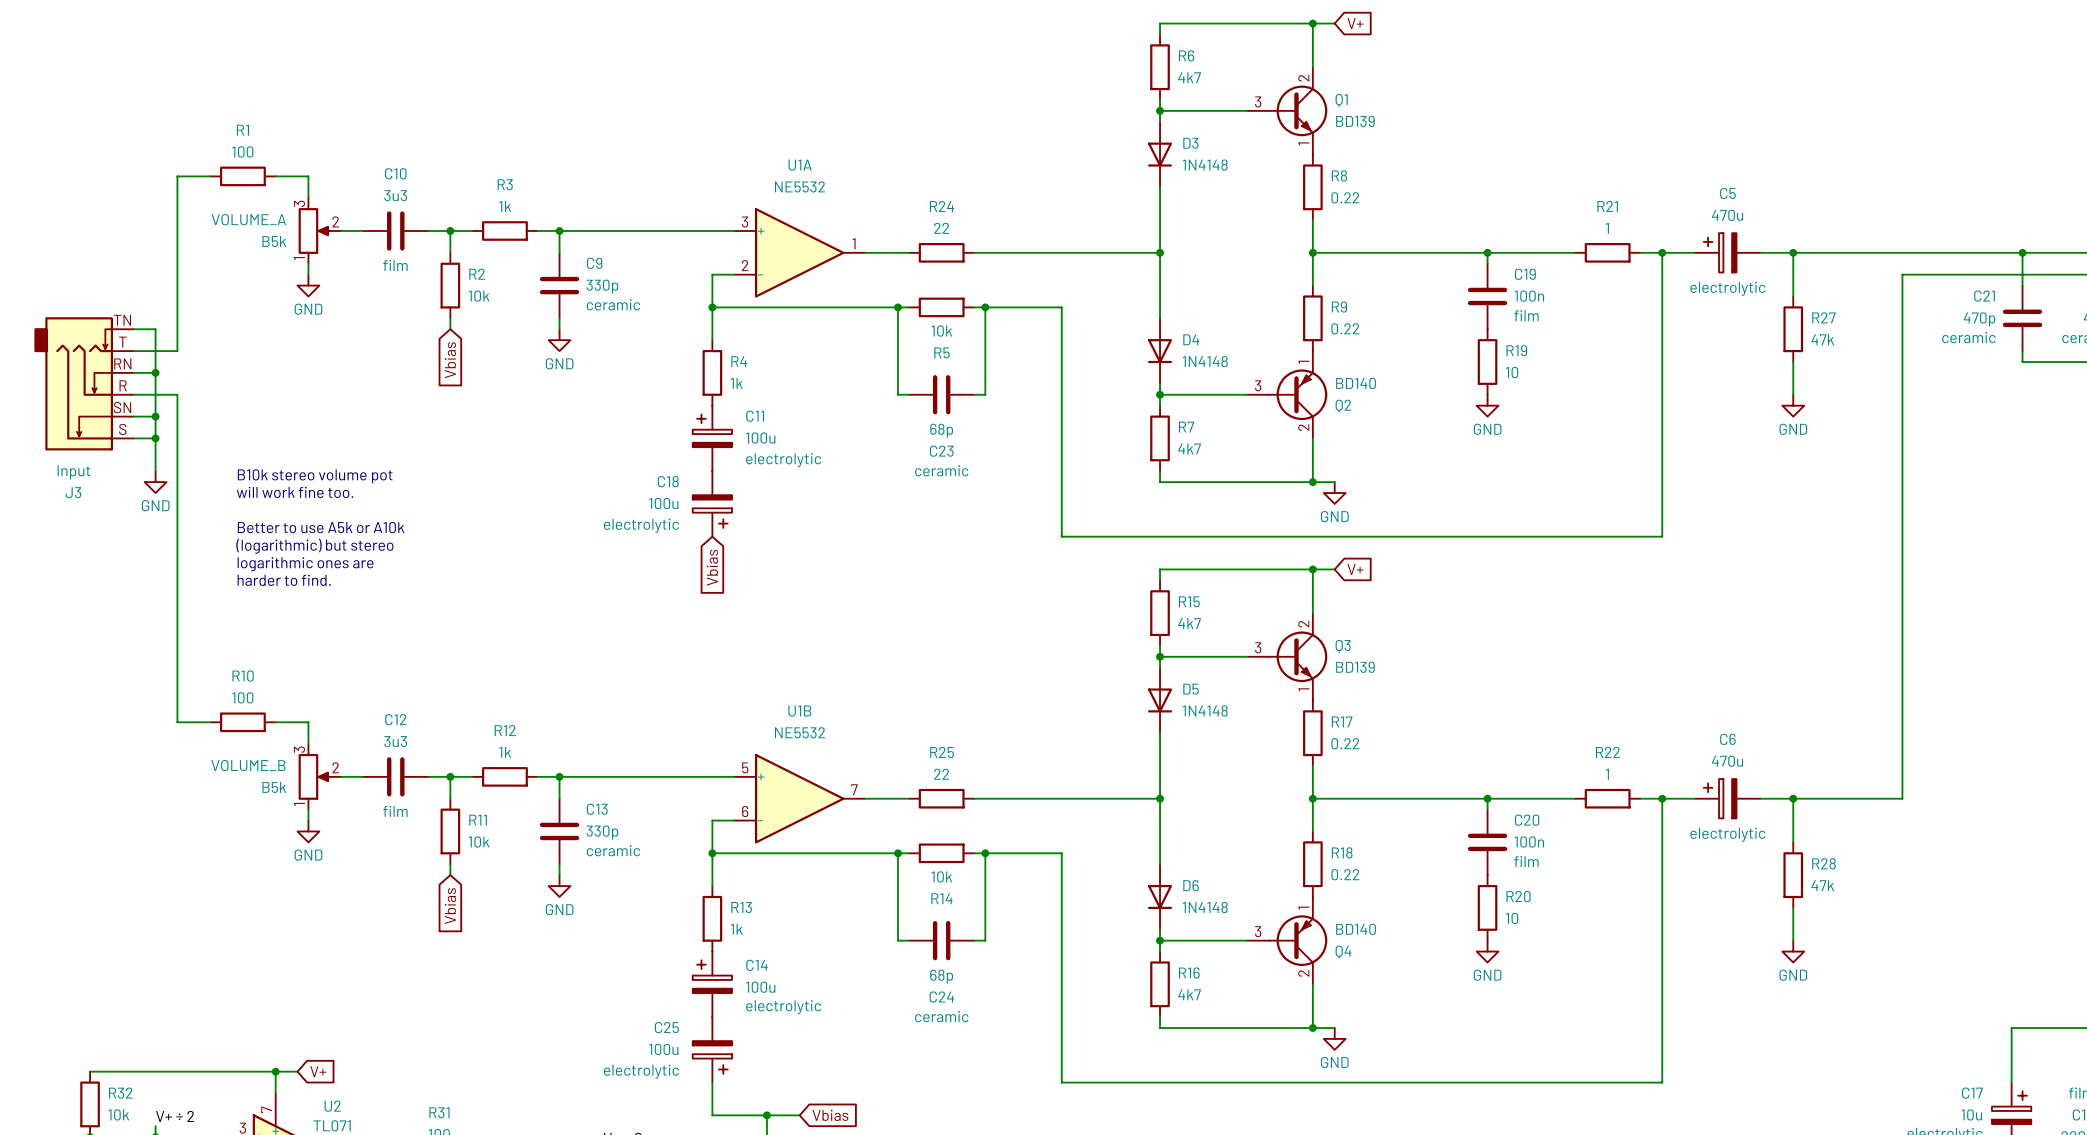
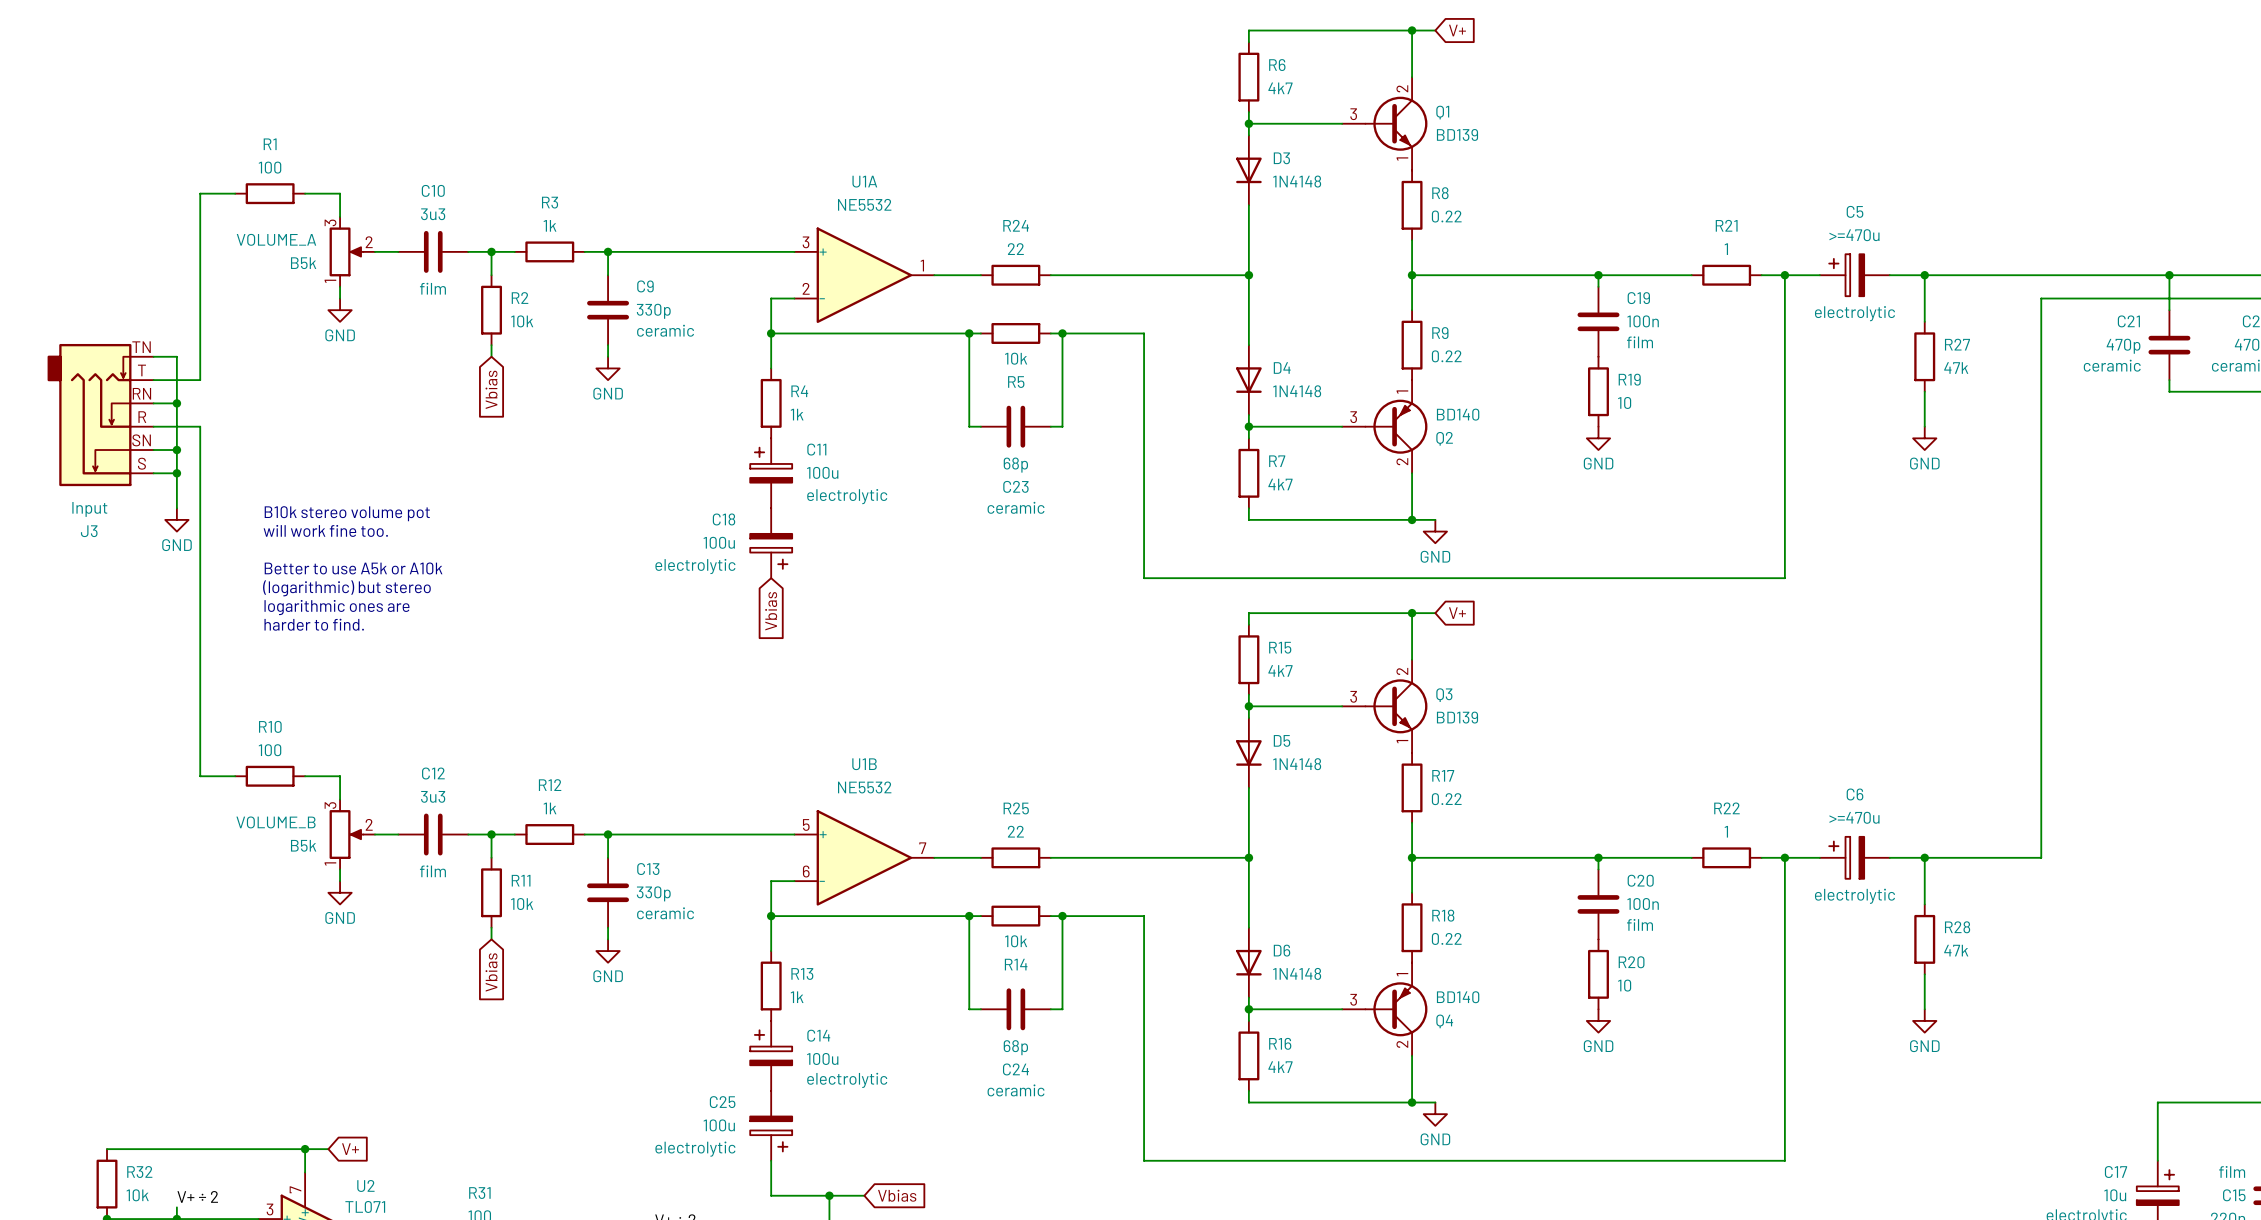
C5 value: 470u (1727, 215) -> >=470u (1854, 235)
C6 value: 470u (1727, 761) -> >=470u (1854, 817)

